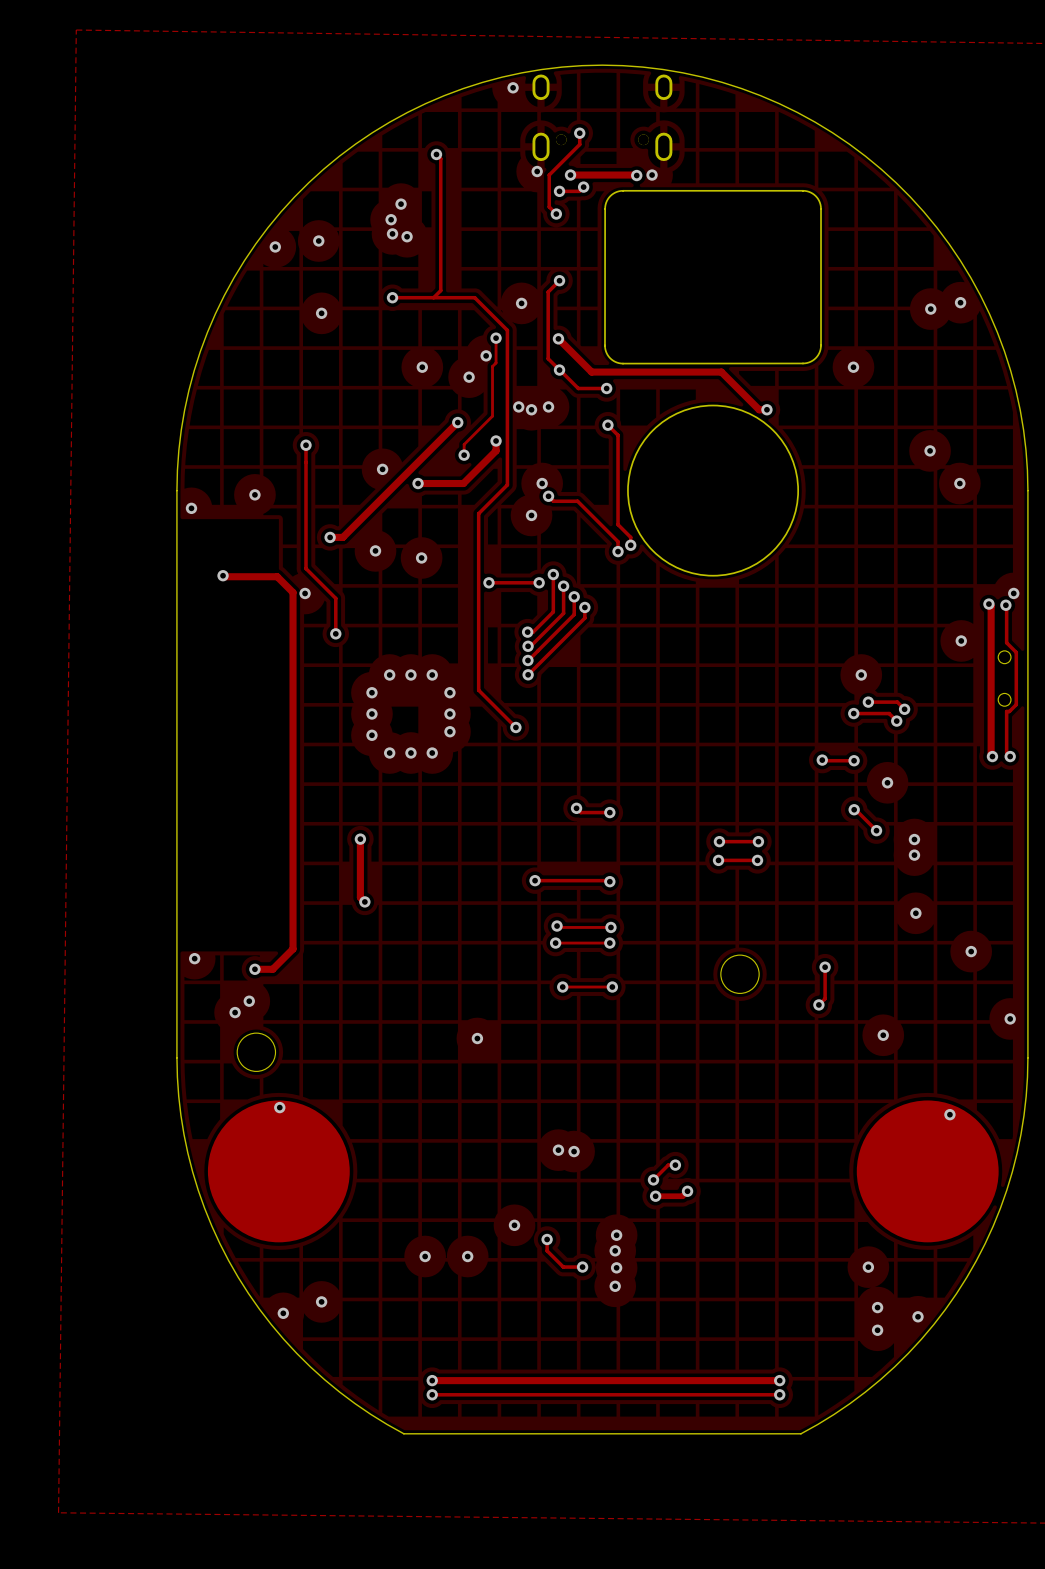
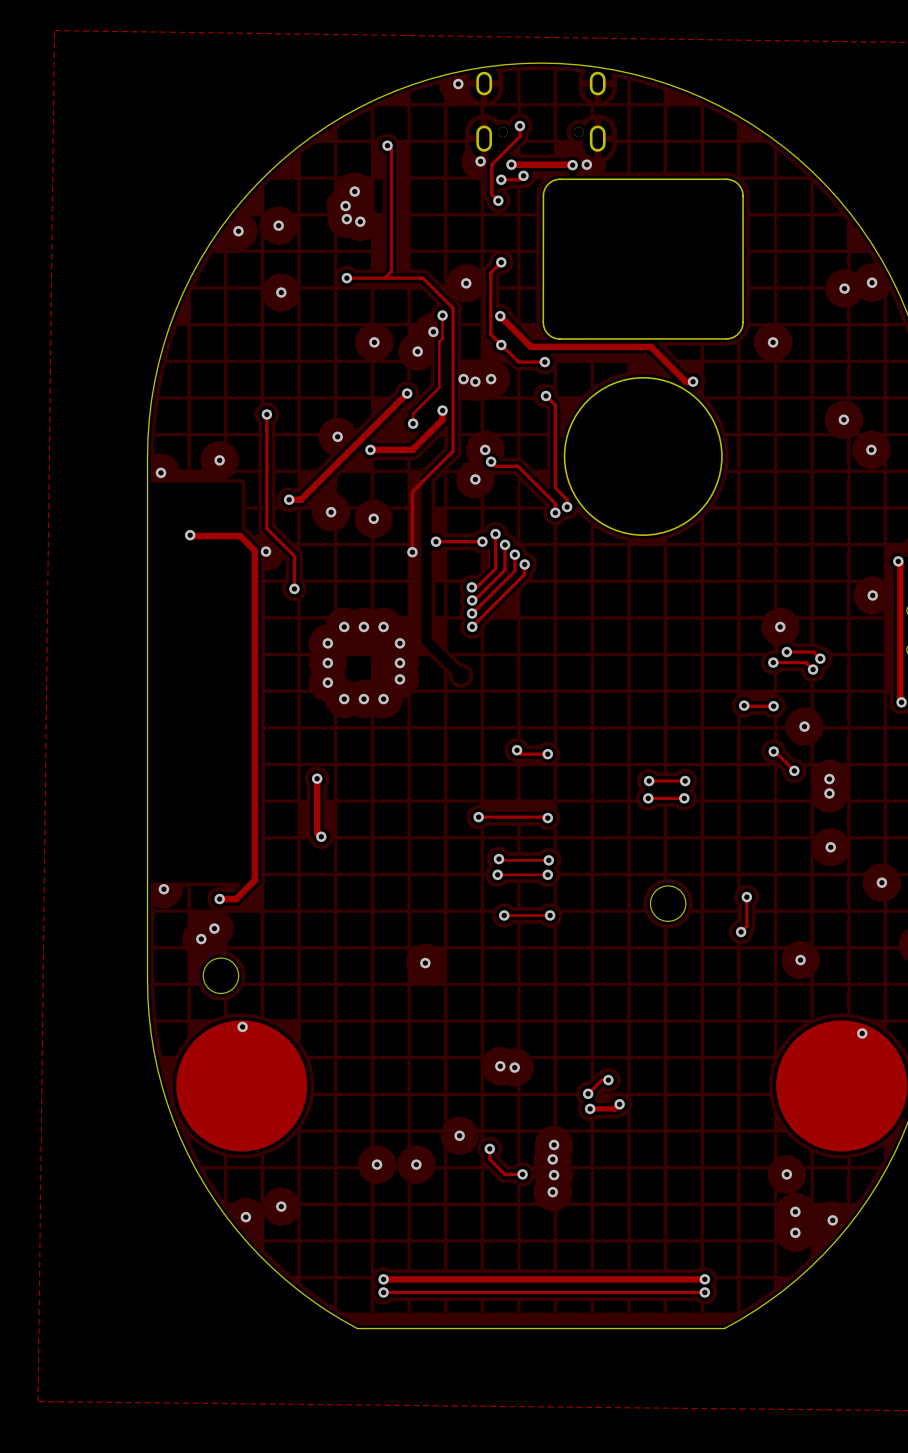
track: (478, 513) (478, 690) (515, 727) -> (426, 477) (412, 491) (412, 552)
via: none -> (412, 552)
via: (515, 727) -> none

